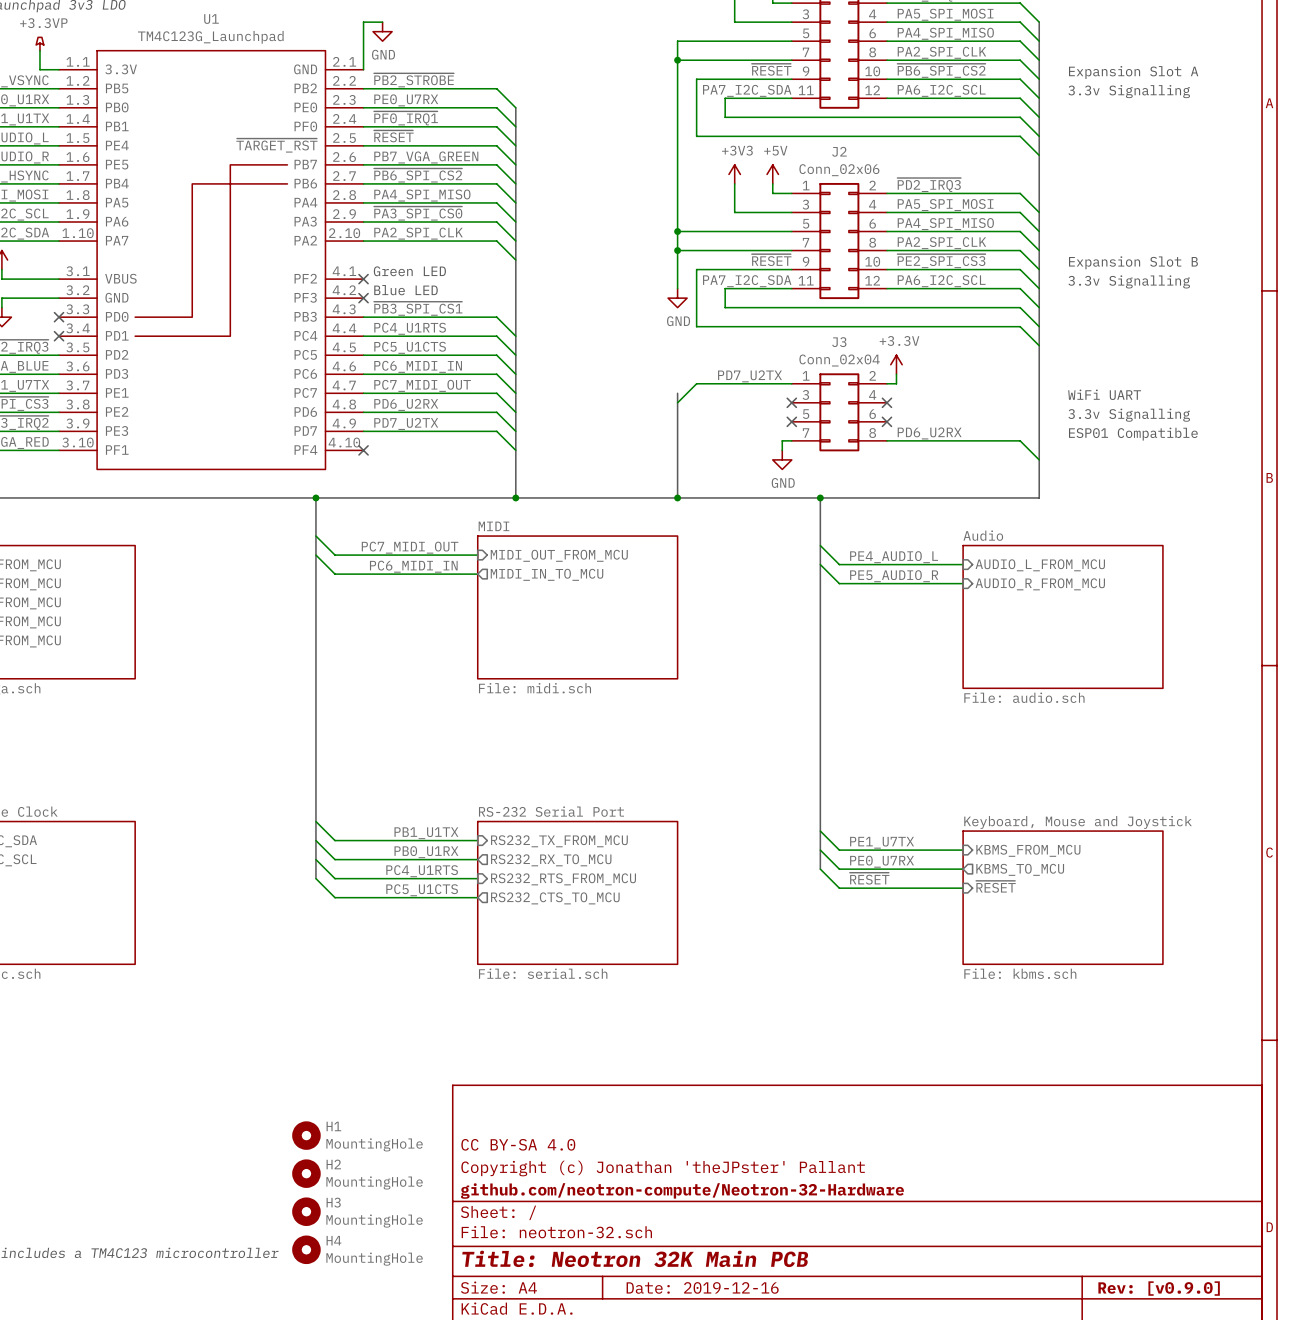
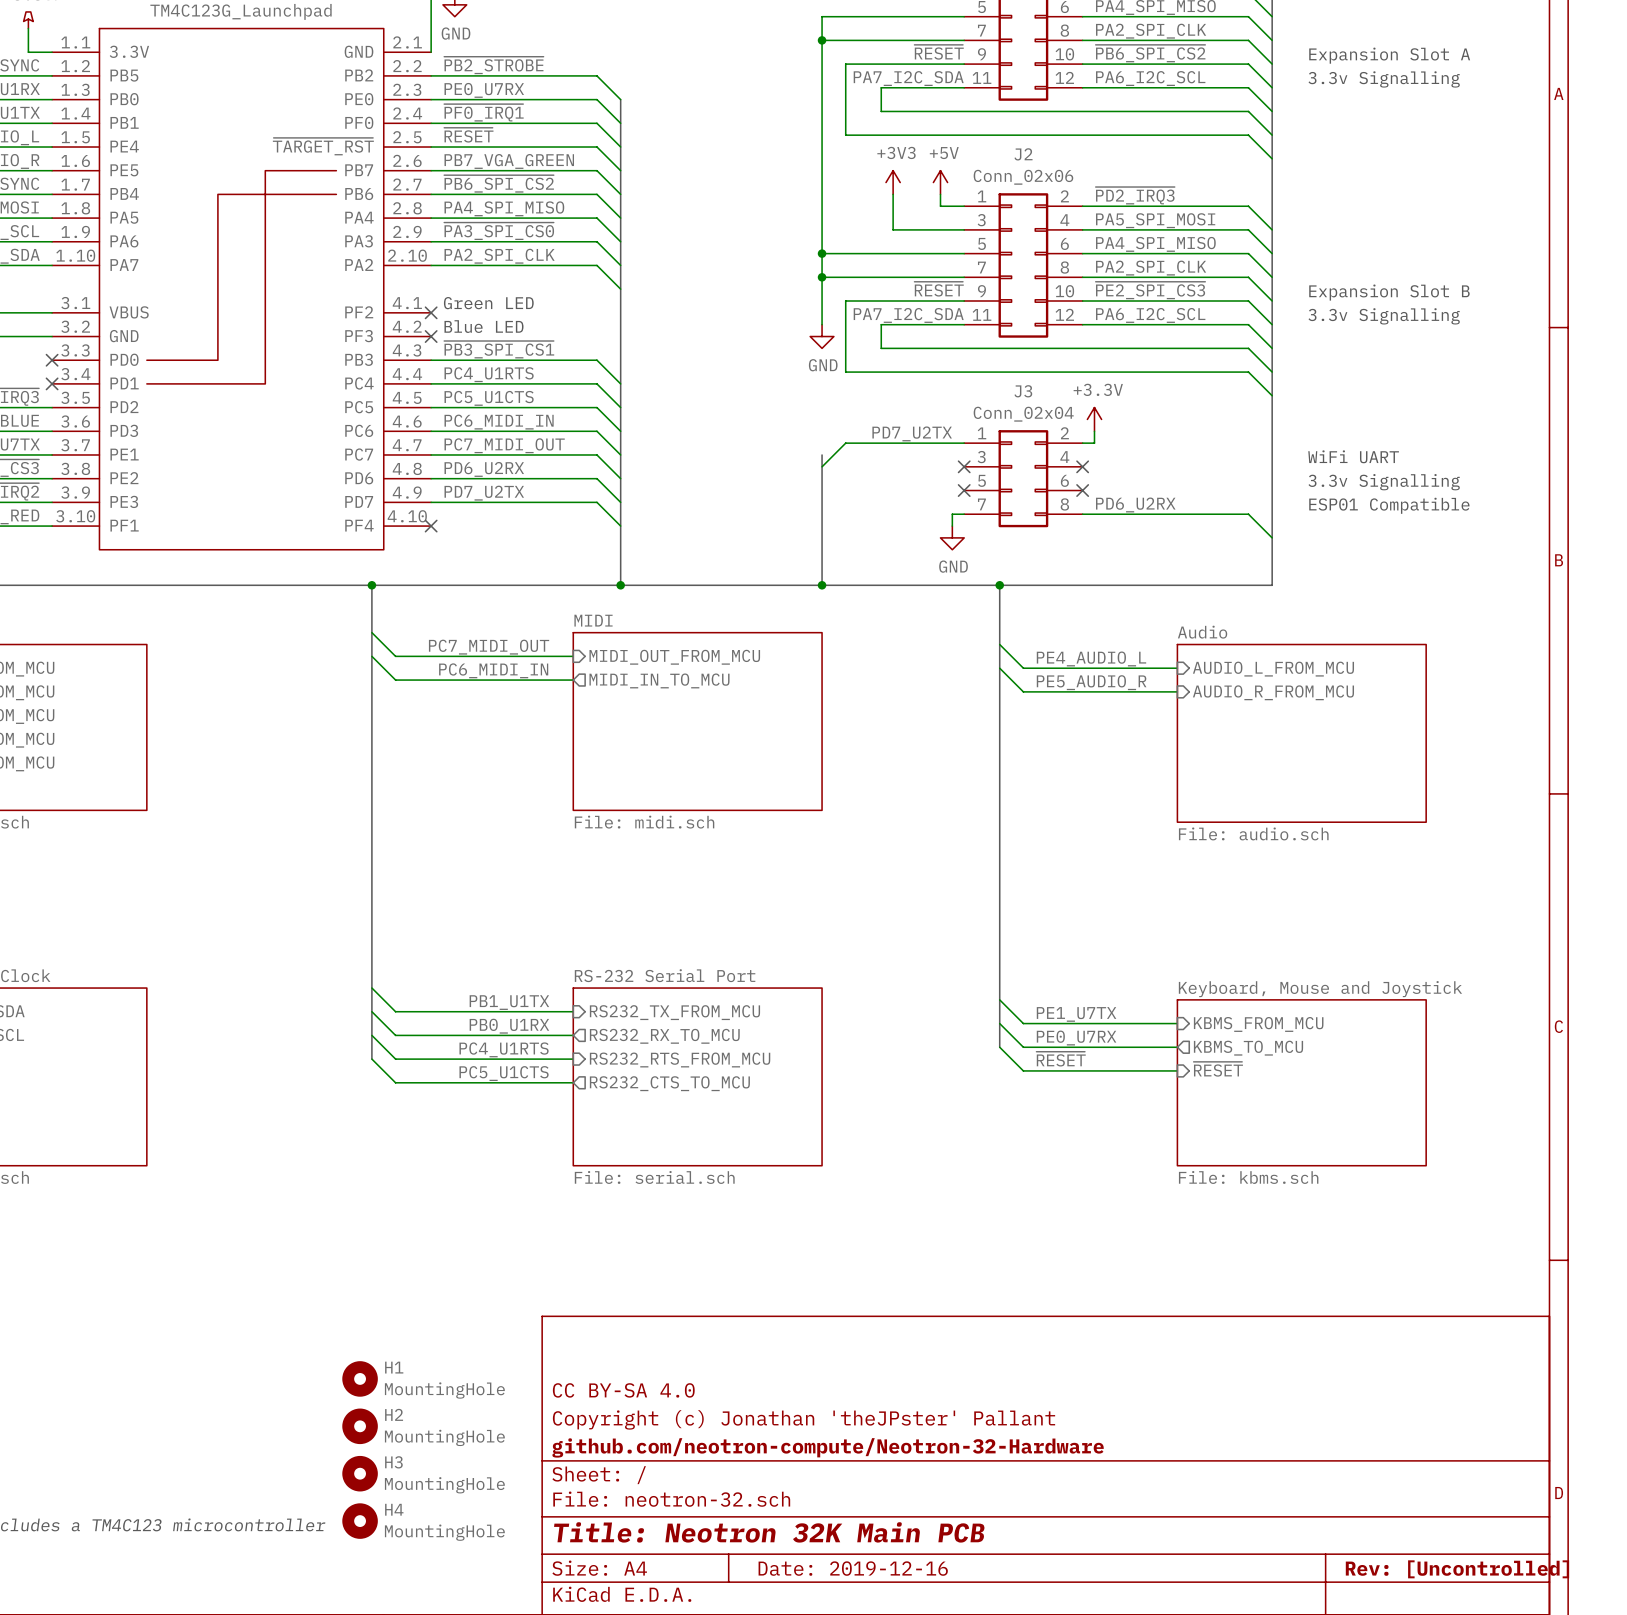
title block: Rev: [v0.9.0] (1159, 1288) -> Rev: [Uncontrolled] (1457, 1569)

